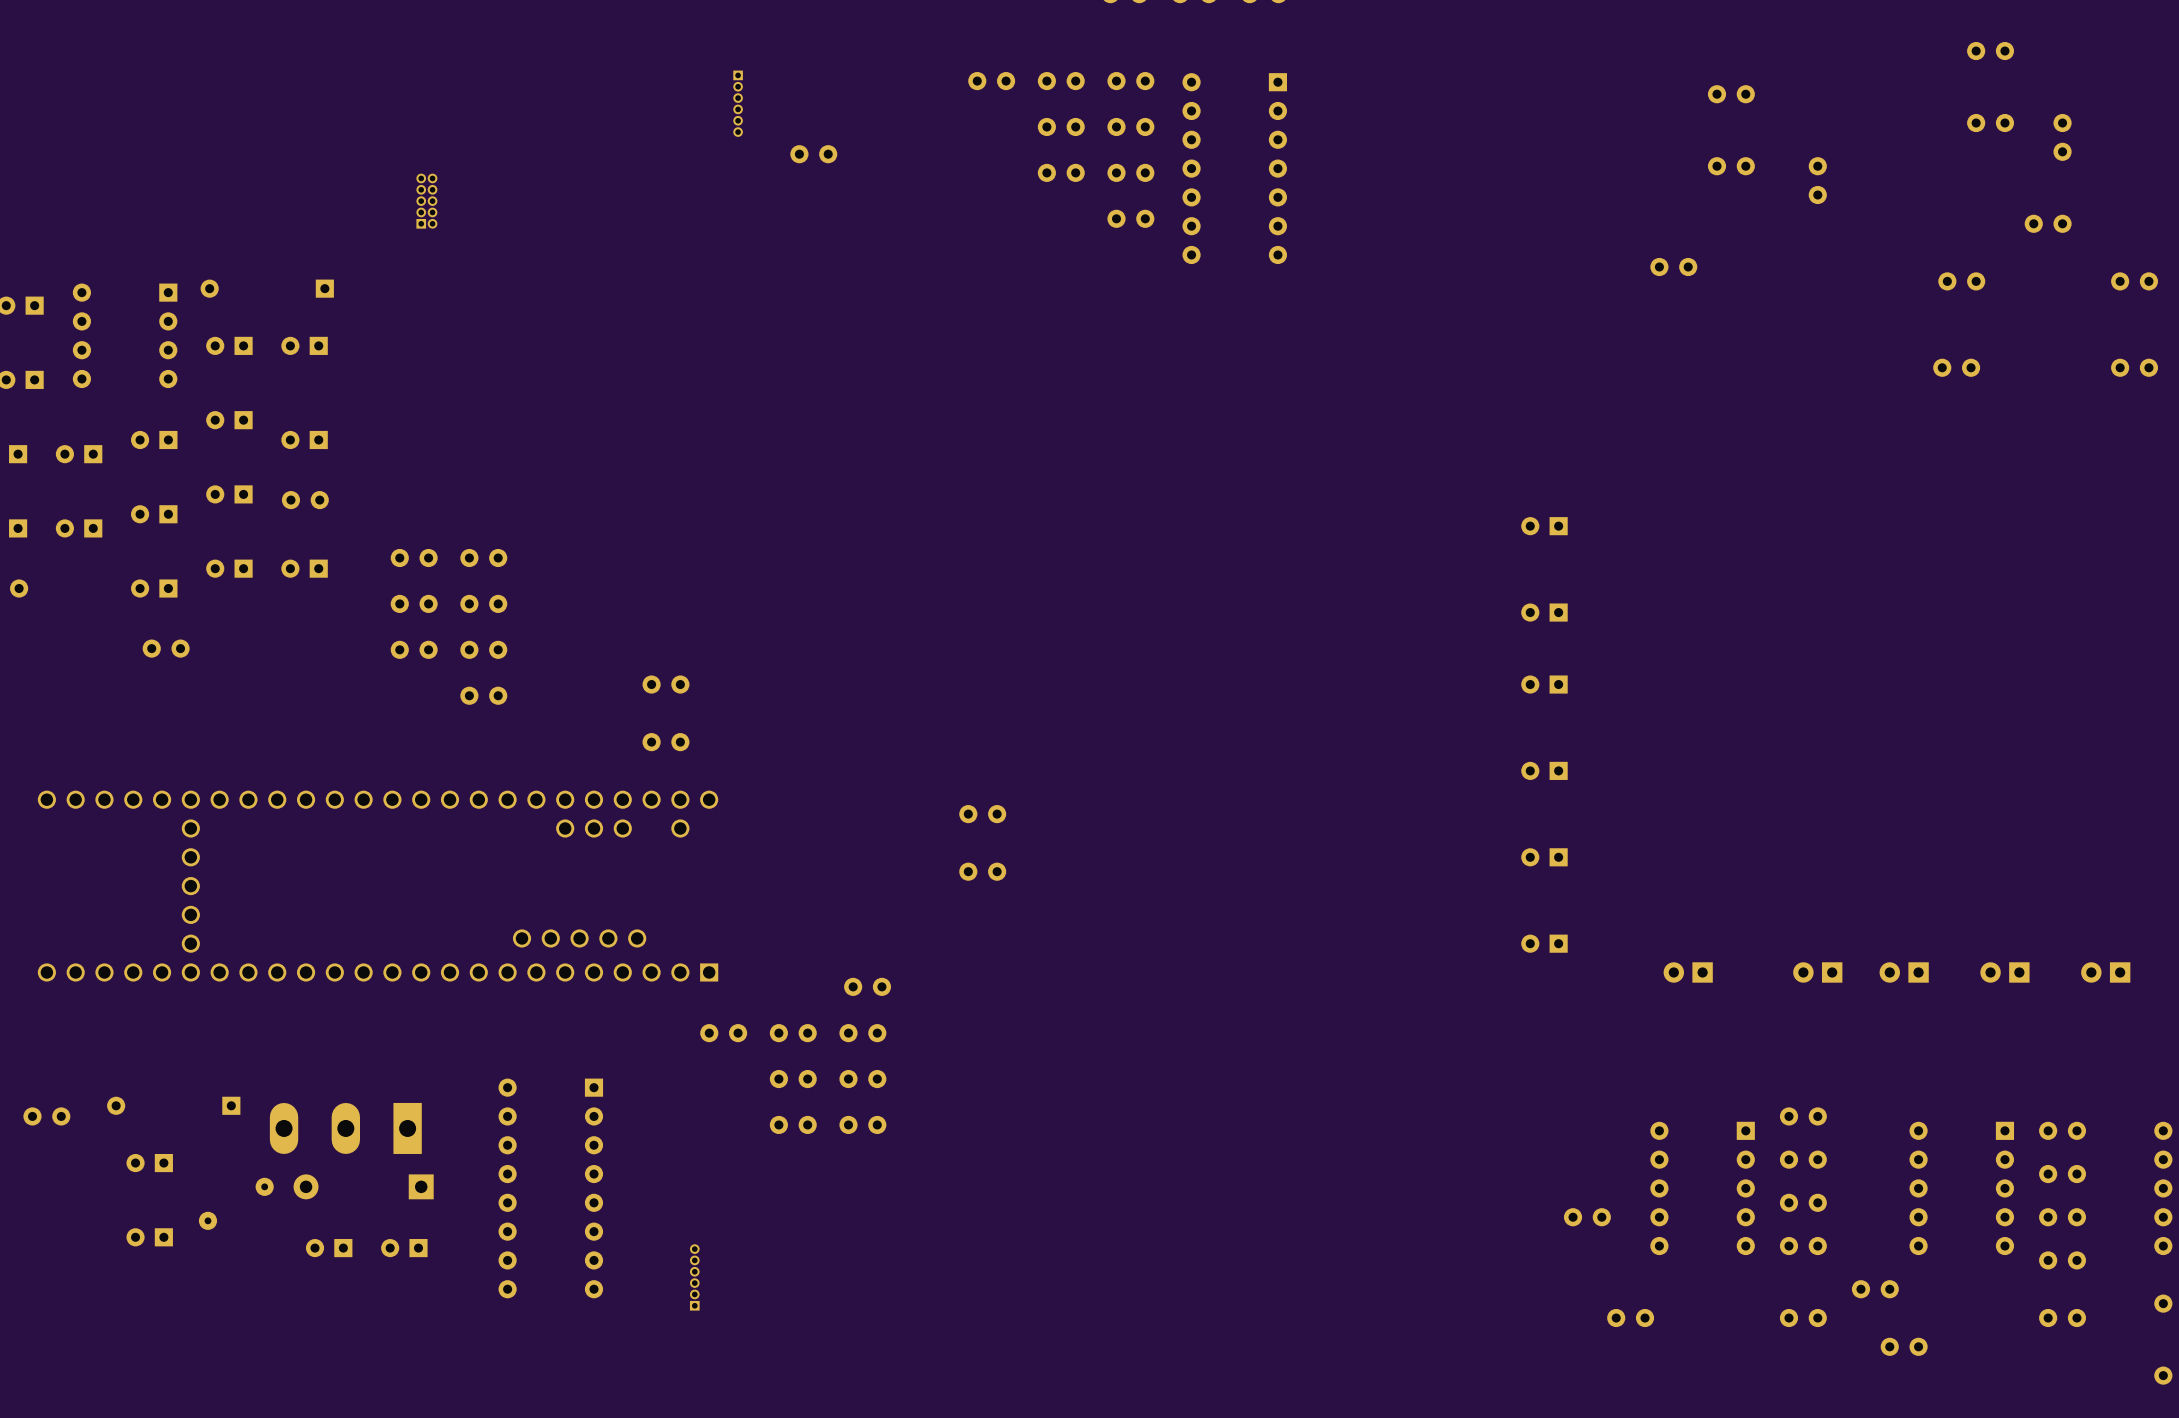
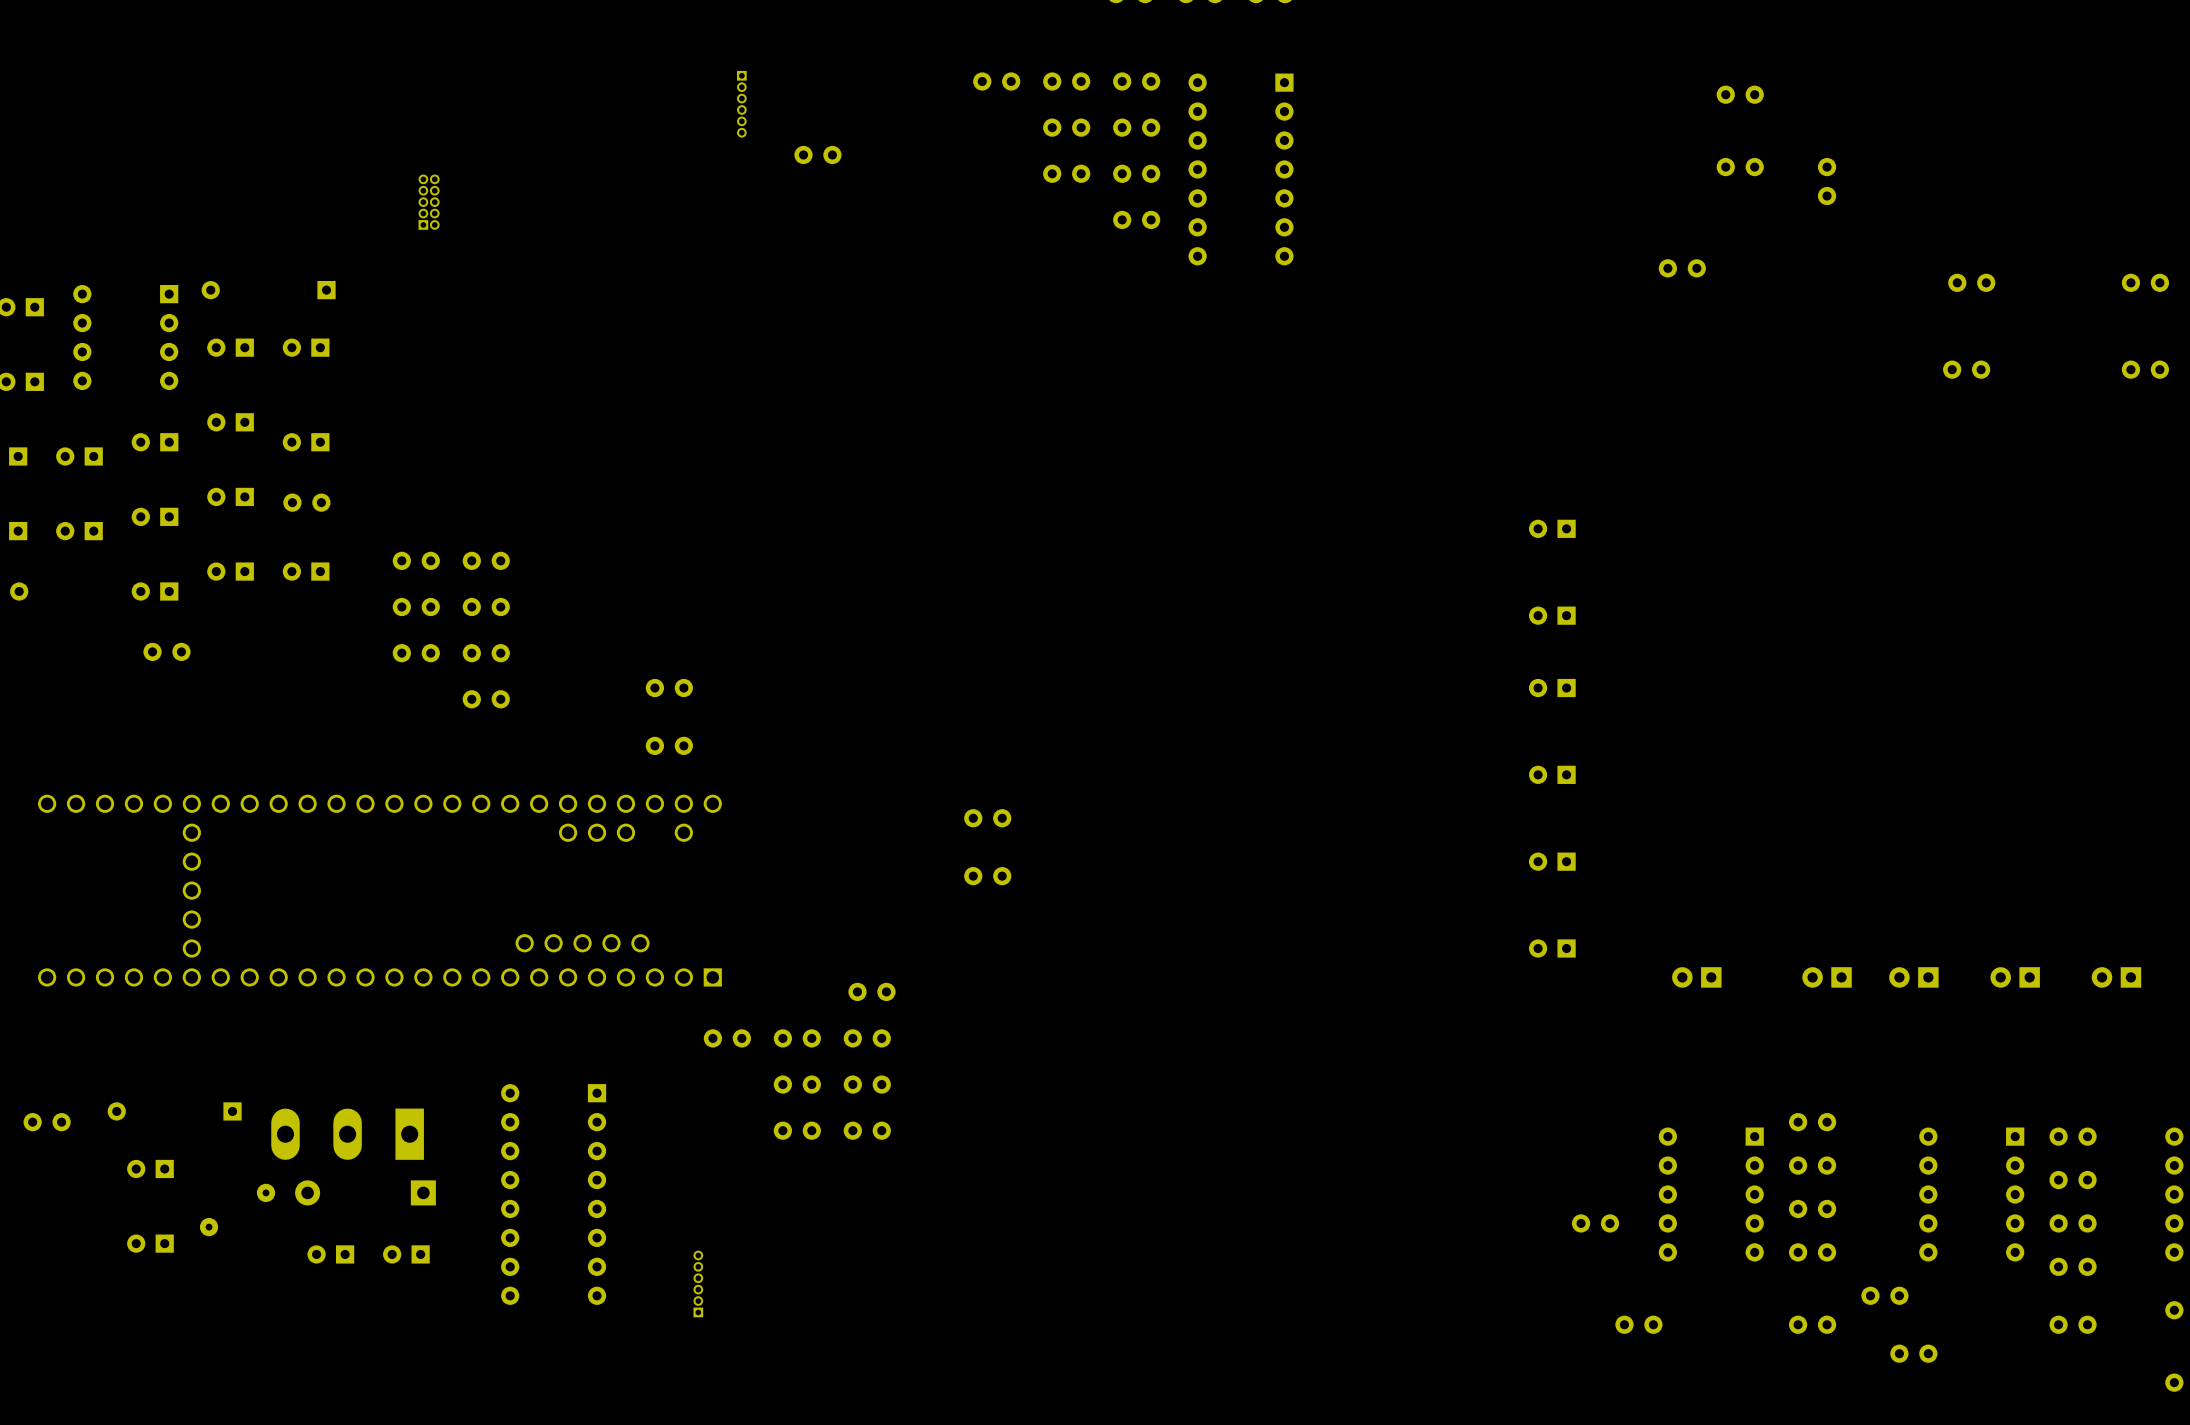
part: (1990, 51) -> none
part: (1990, 123) -> none
part: (2062, 137) -> none
part: (2048, 223) -> none

